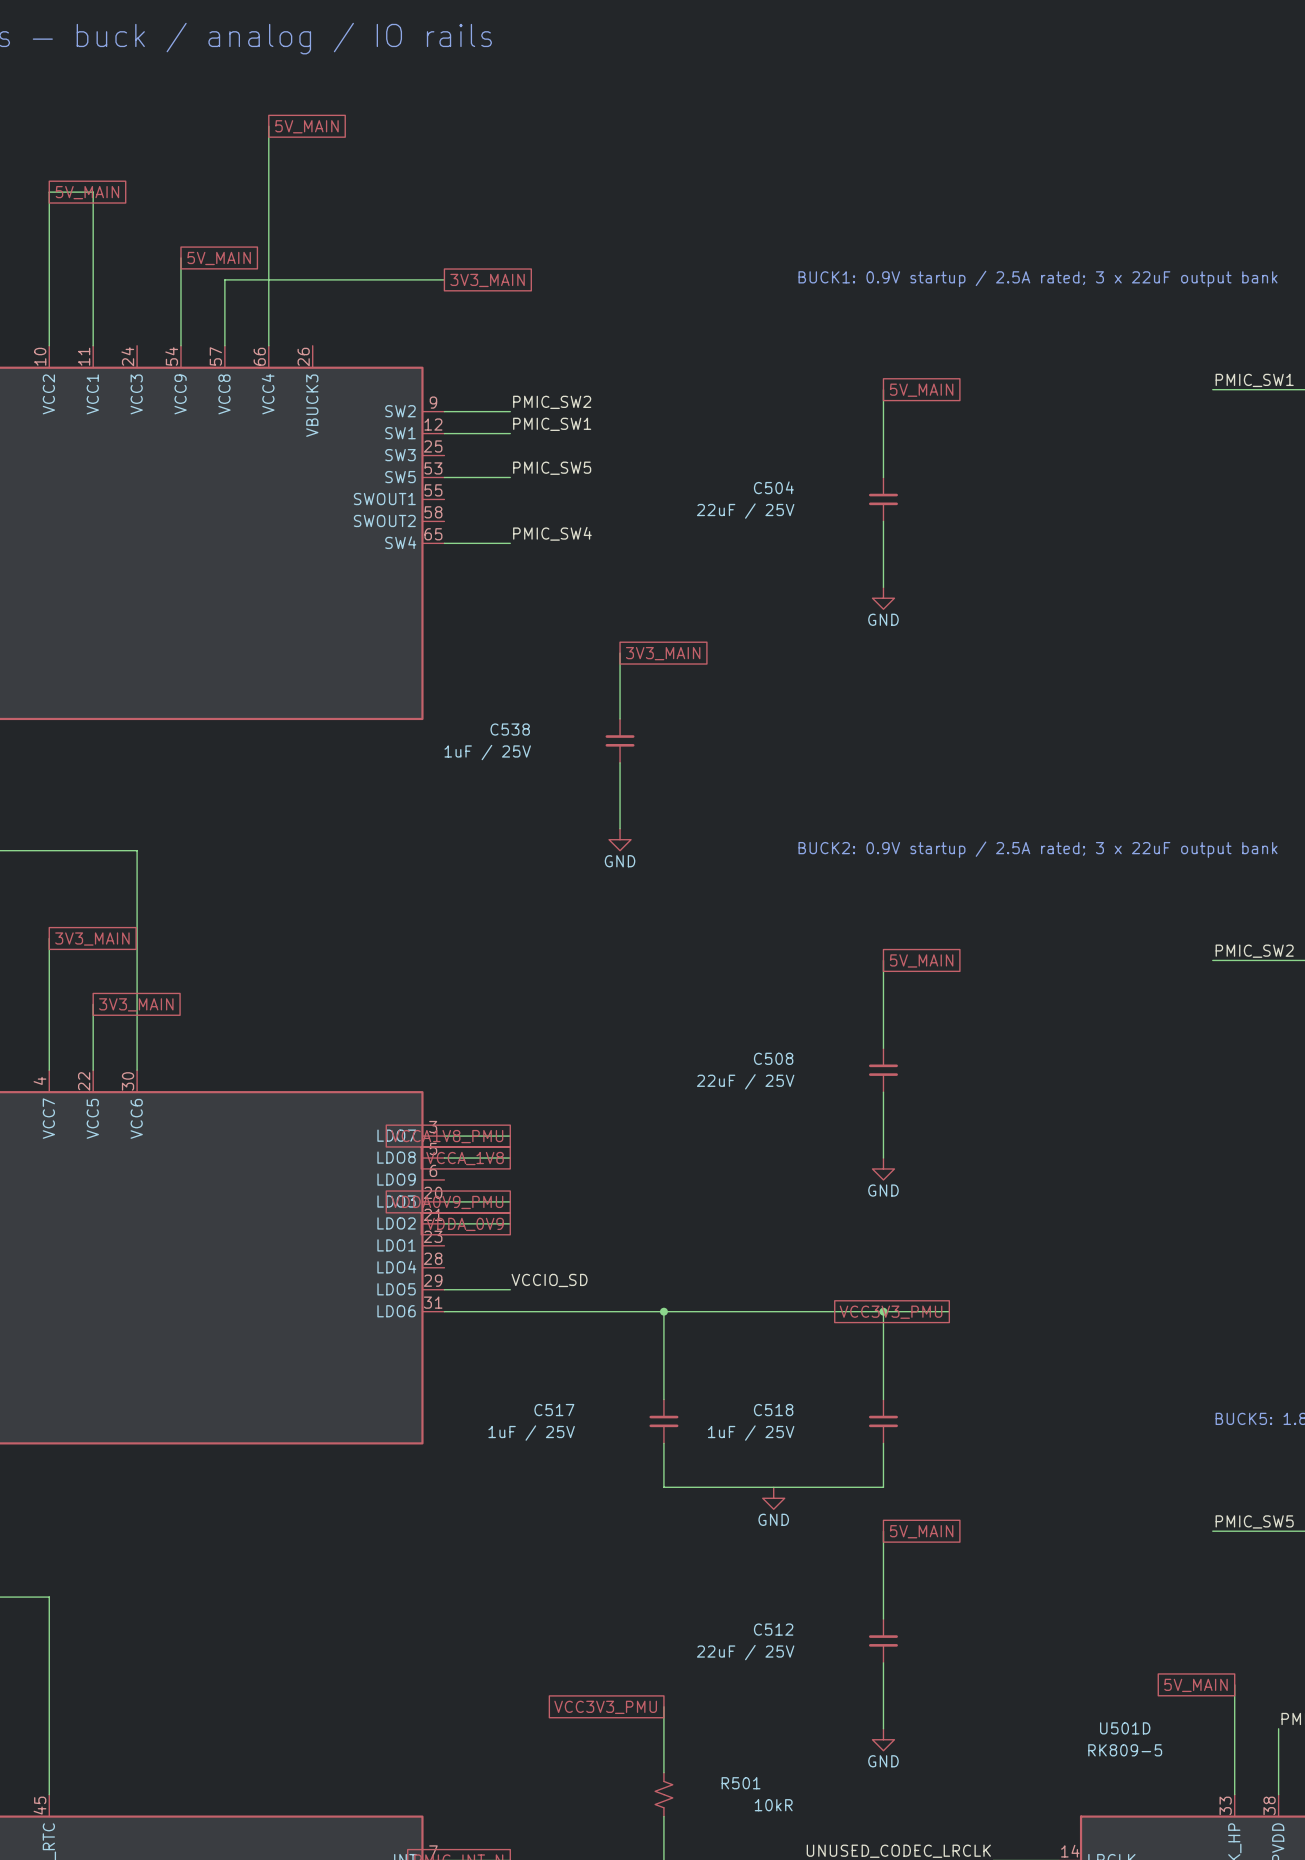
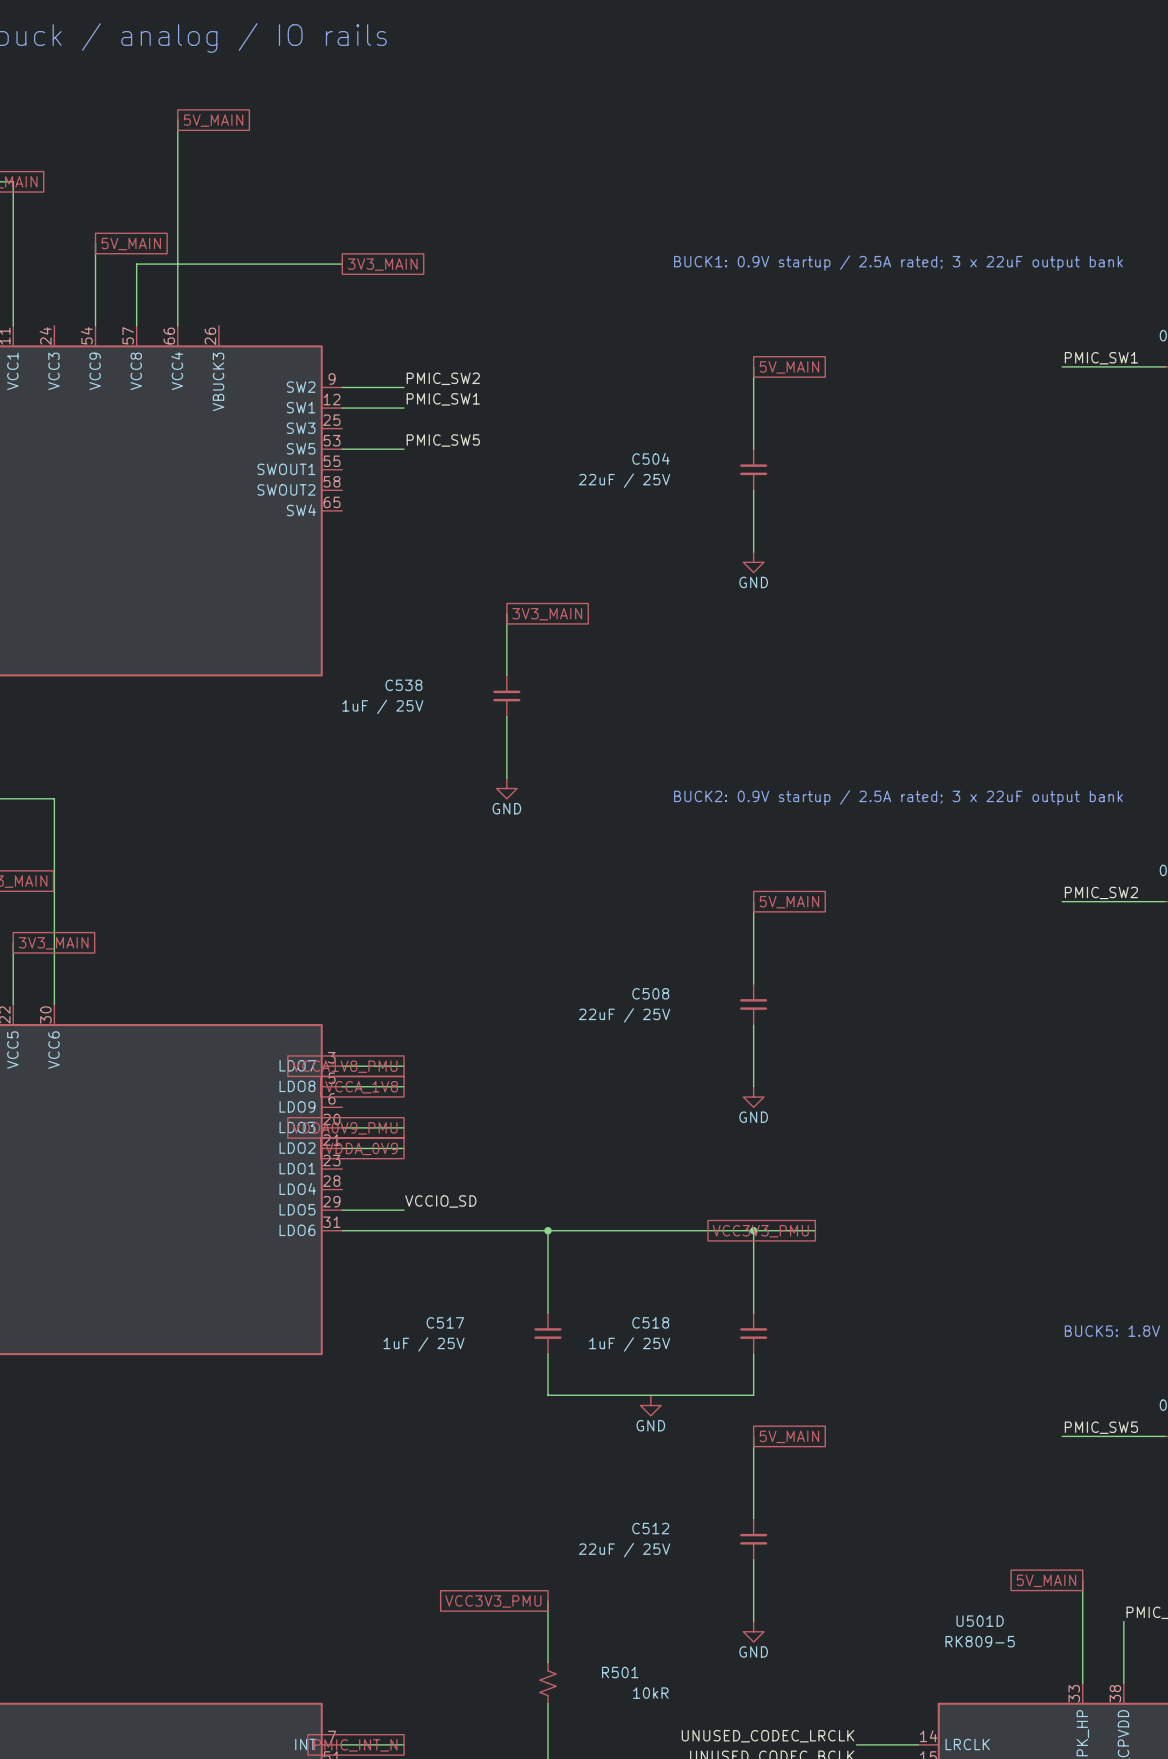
label: PMIC_SW4 (552, 533) -> none
wire: (444, 543) (510, 543) -> none

